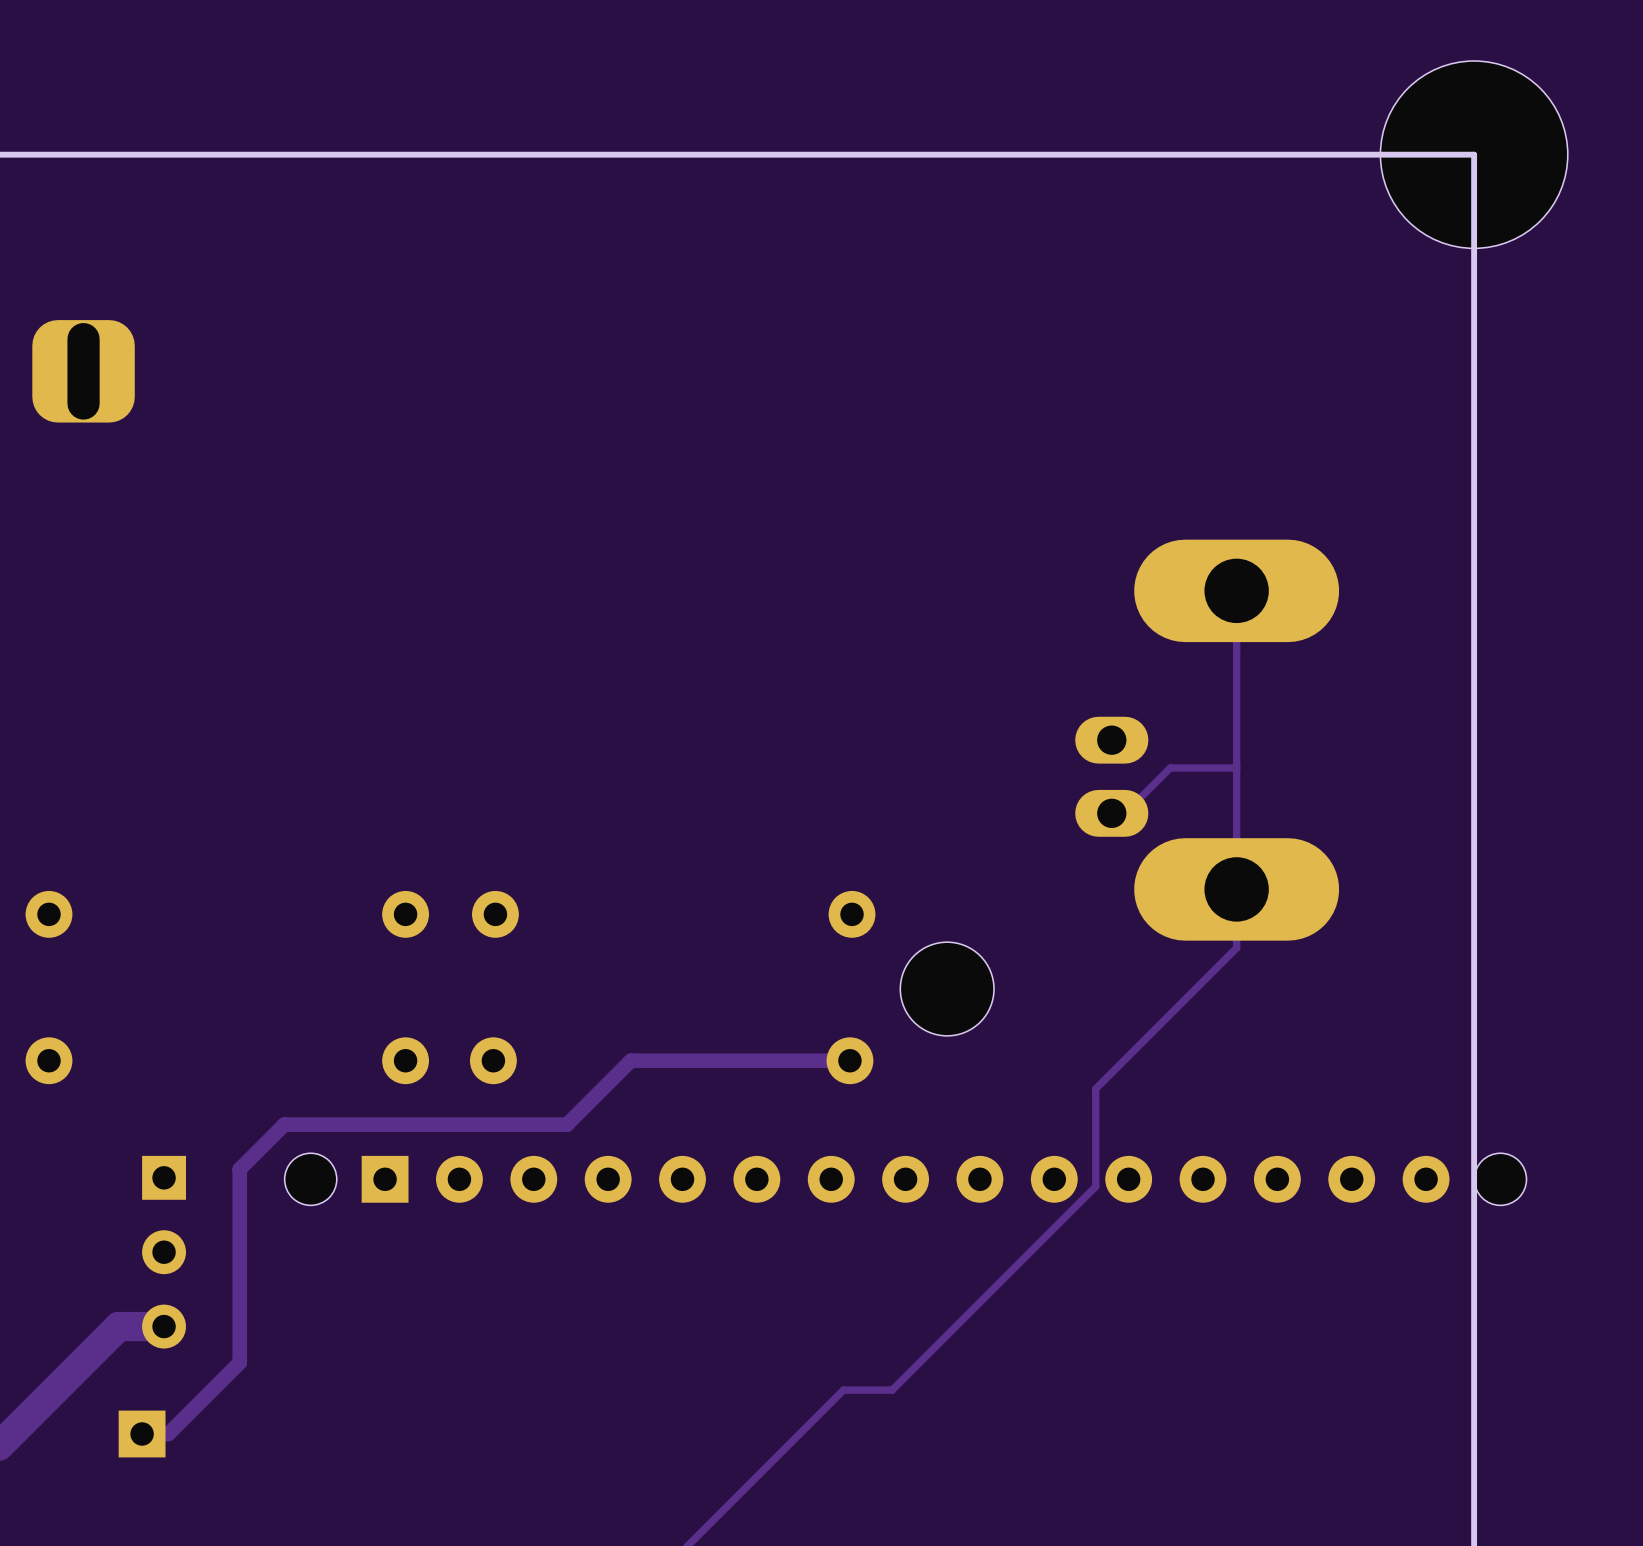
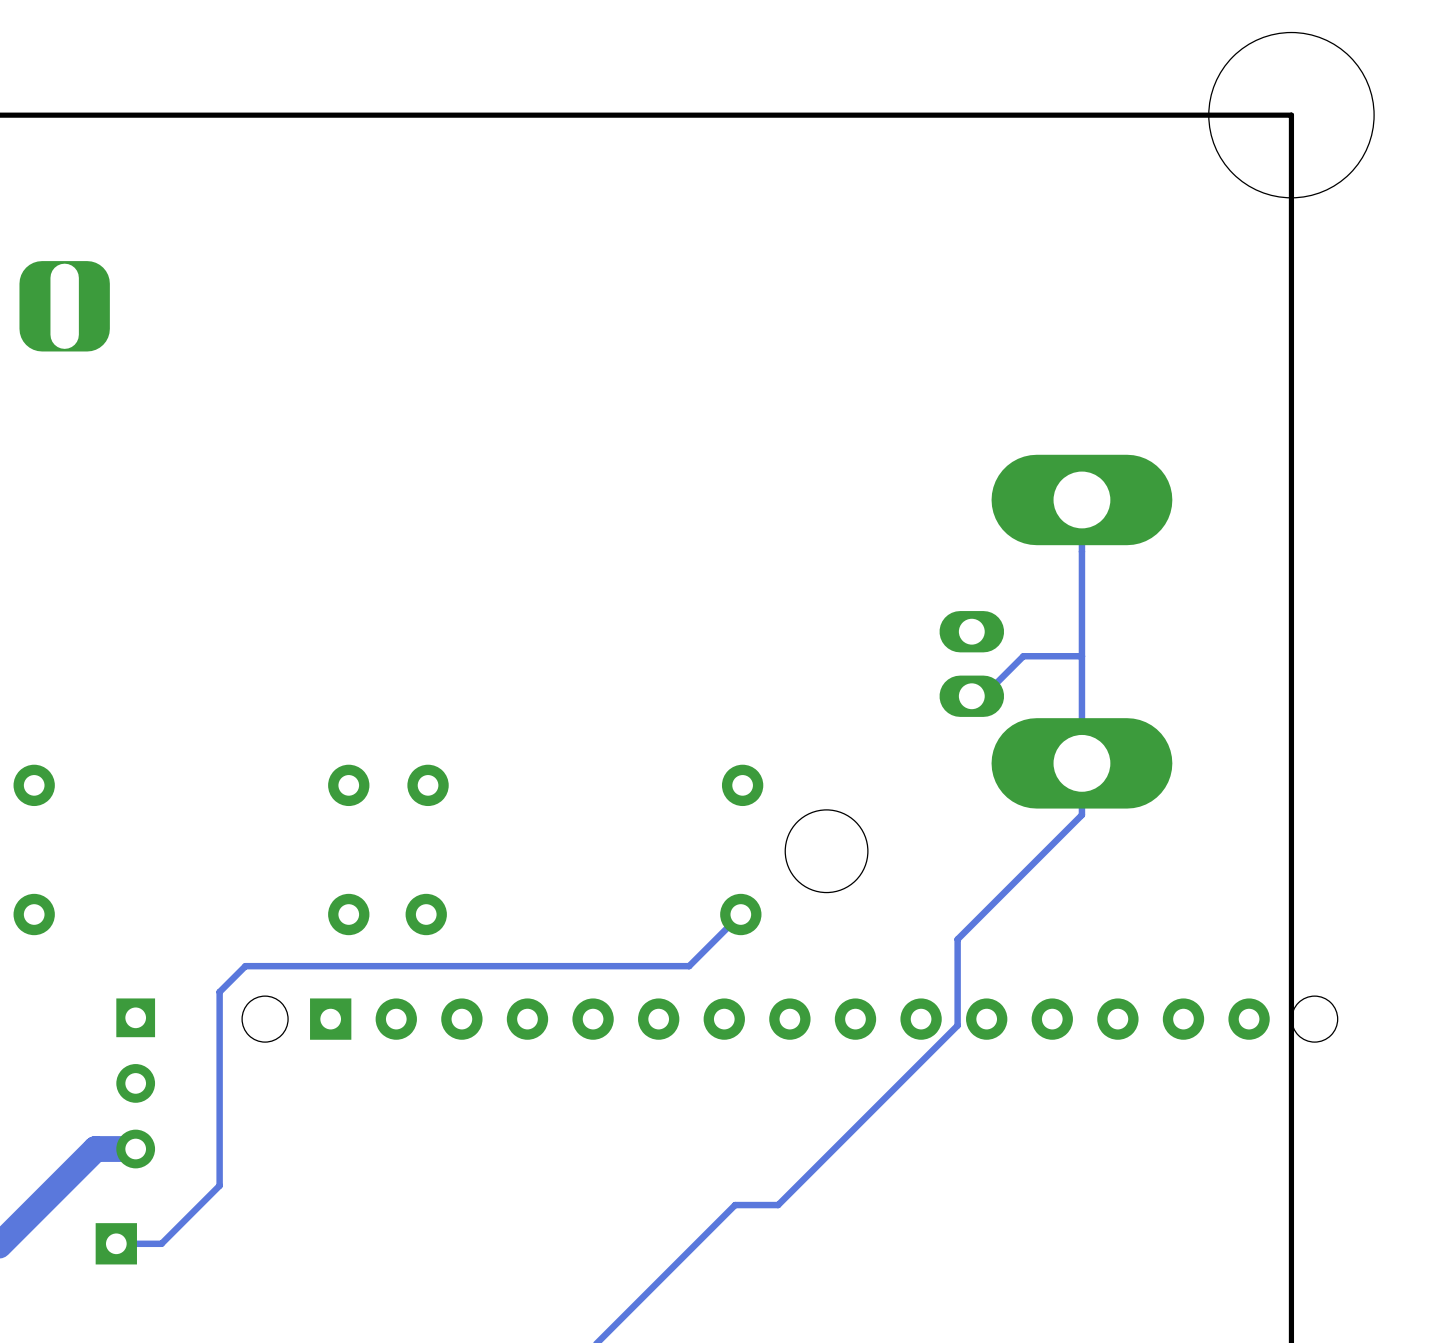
track: (849, 1060) (630, 1060) (566, 1124) (284, 1124) (239, 1169) (239, 1362) (168, 1434) -> (740, 914) (689, 966) (245, 966) (219, 991) (219, 1185) (161, 1243) (139, 1243)

